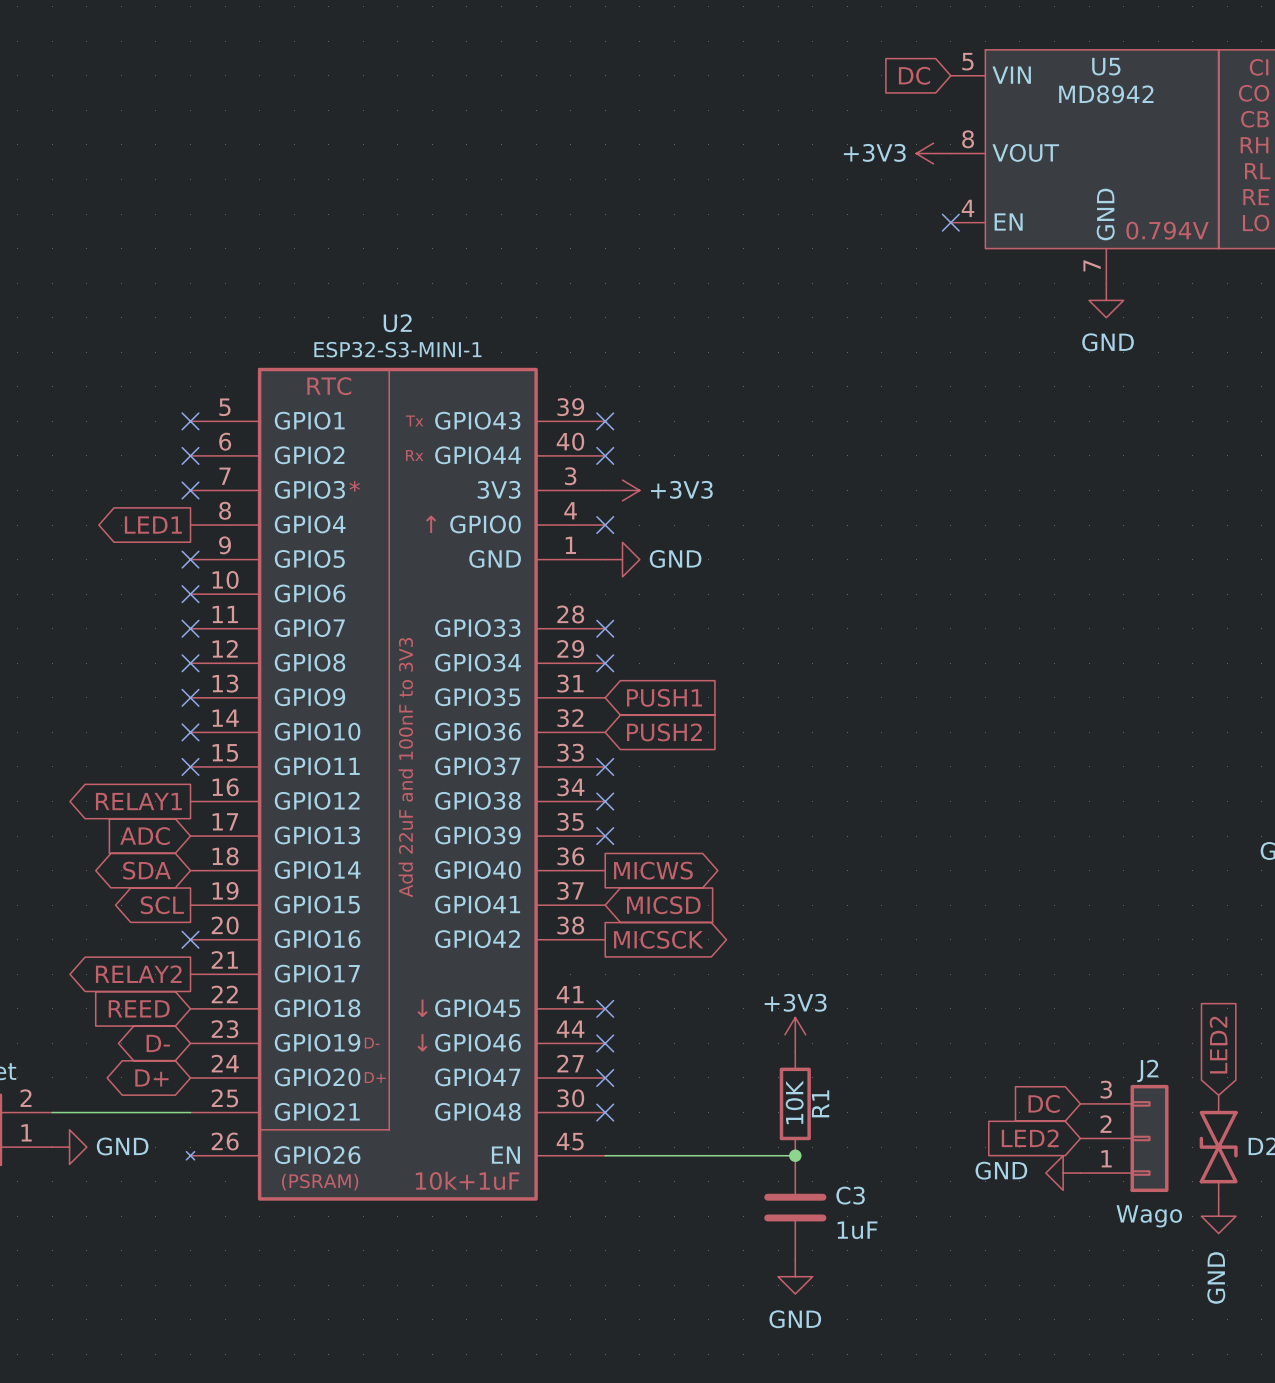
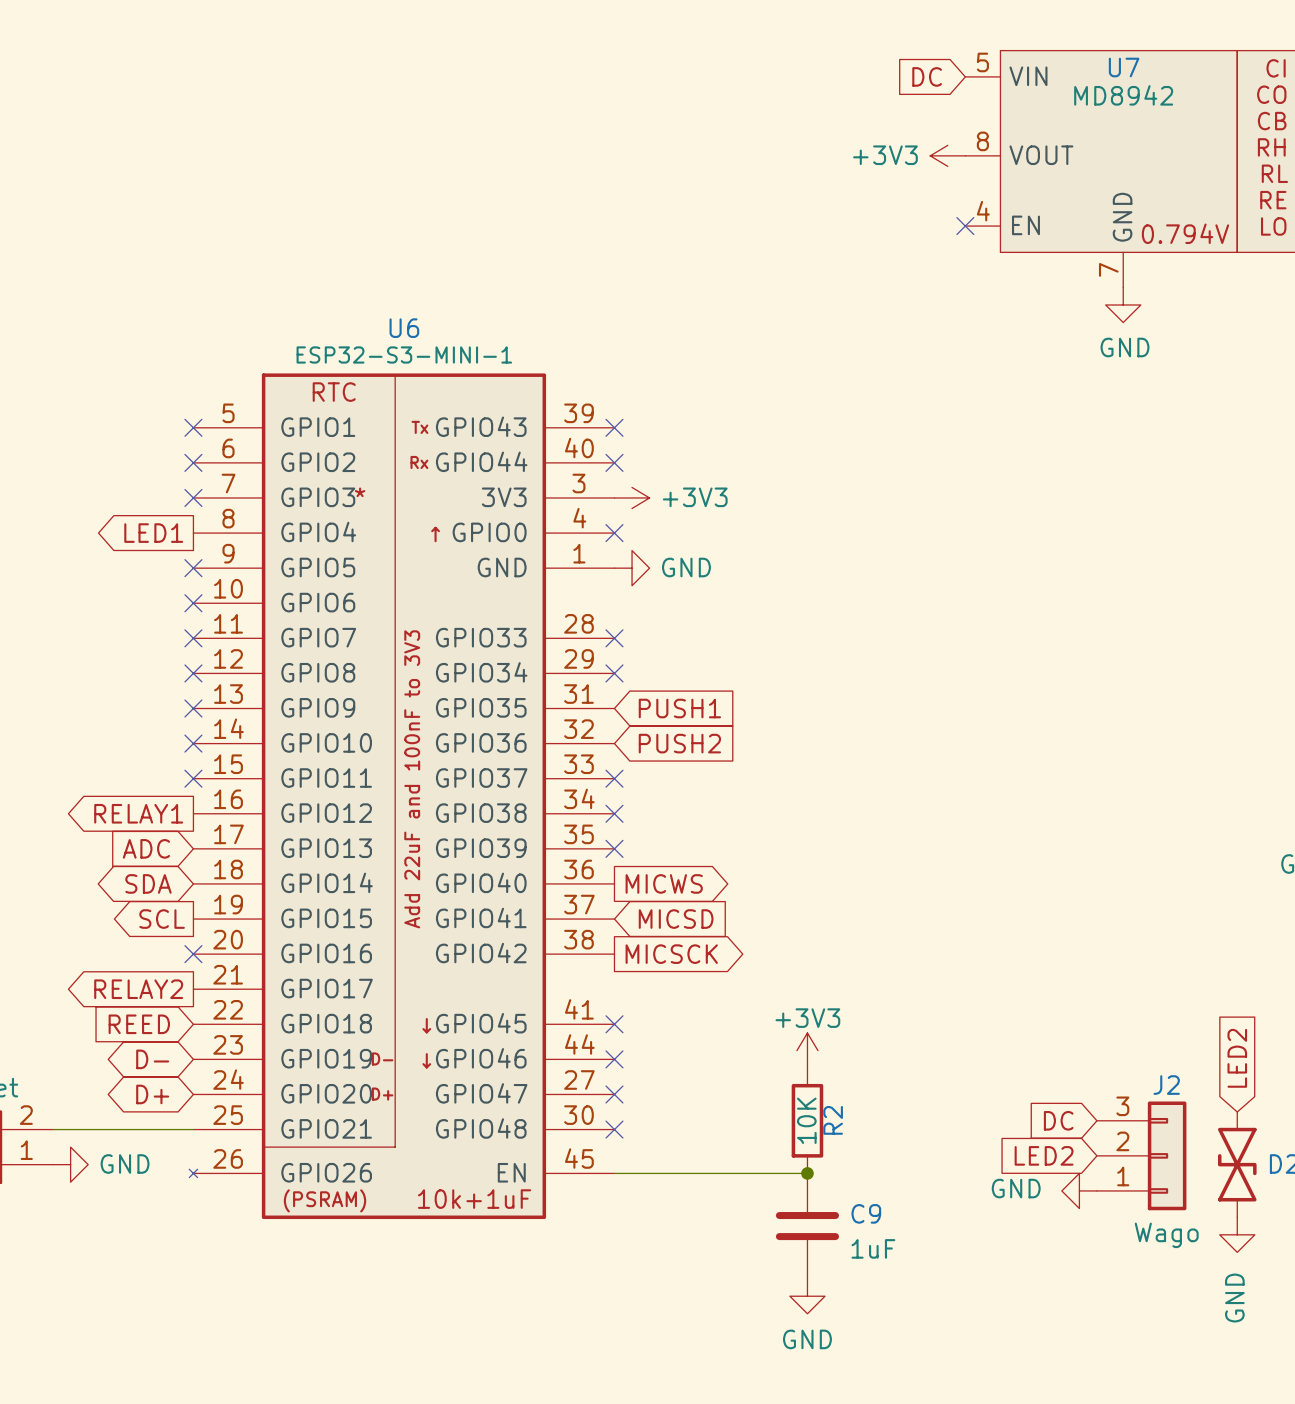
U5 name: U5 (1106, 66) -> U7 (1124, 67)
U2 name: U2 (397, 323) -> U6 (404, 328)
R1 name: R1 (820, 1103) -> R2 (833, 1120)
C3 name: C3 (850, 1195) -> C9 (866, 1213)

